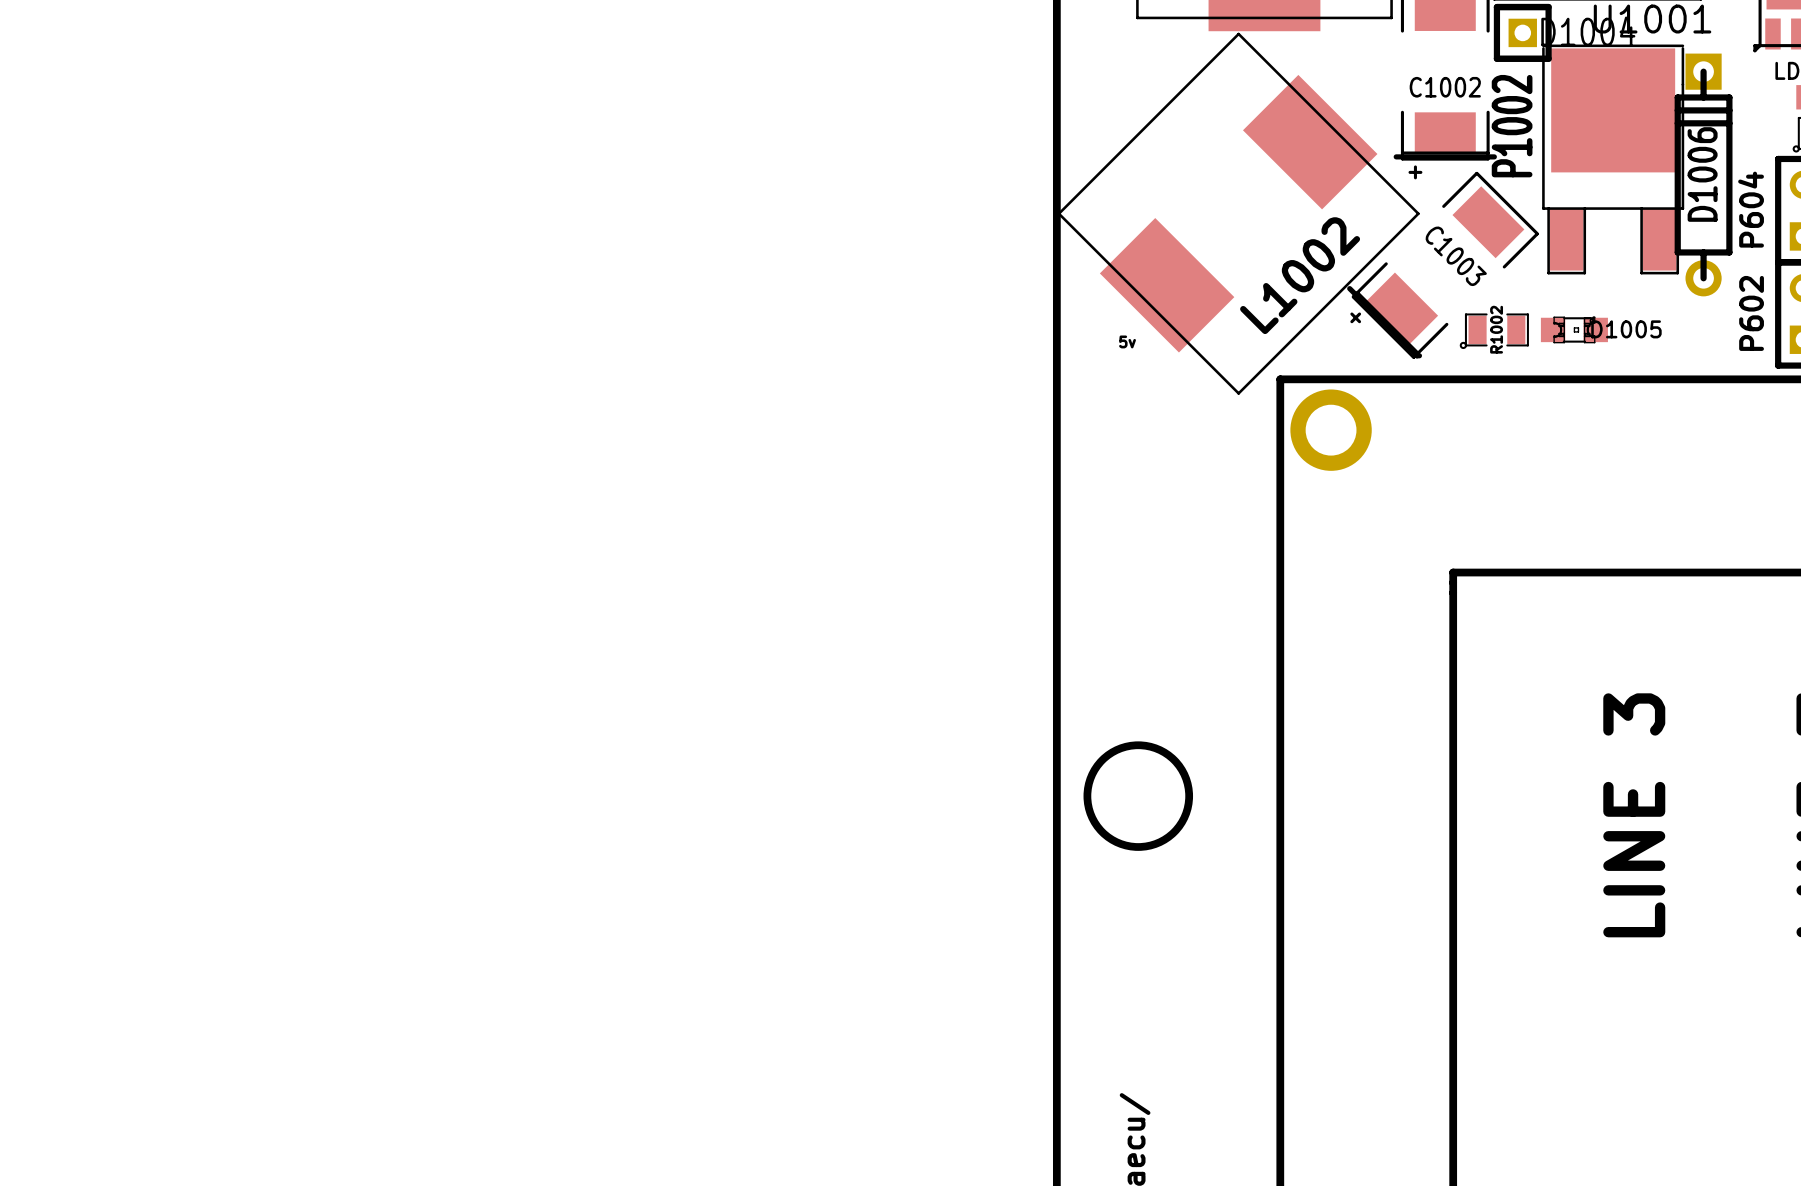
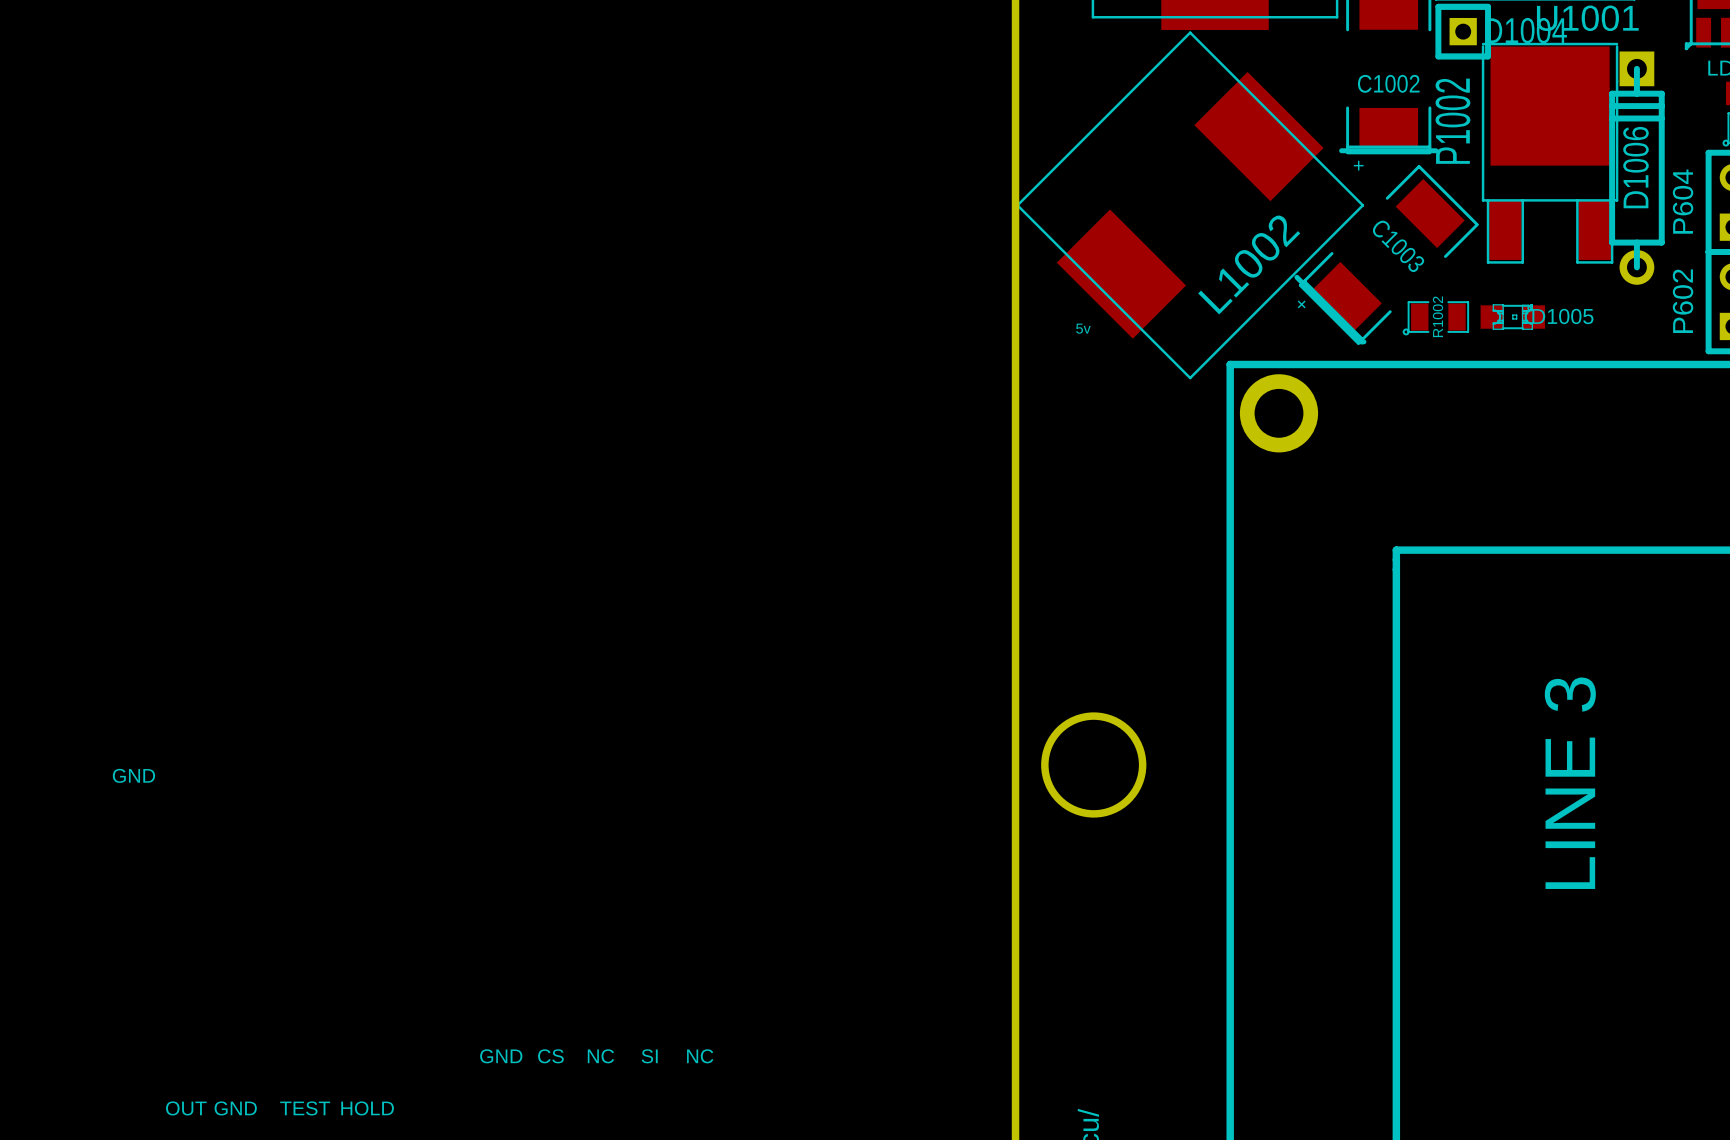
text: none -> GND (133, 775)
text: none -> GND (501, 1056)
text: none -> CS (550, 1056)
text: none -> NC (600, 1056)
text: none -> SI (649, 1056)
text: none -> NC (700, 1056)
text: none -> OUT (186, 1108)
text: none -> GND (235, 1108)
text: none -> TEST (305, 1108)
text: none -> HOLD (367, 1108)

